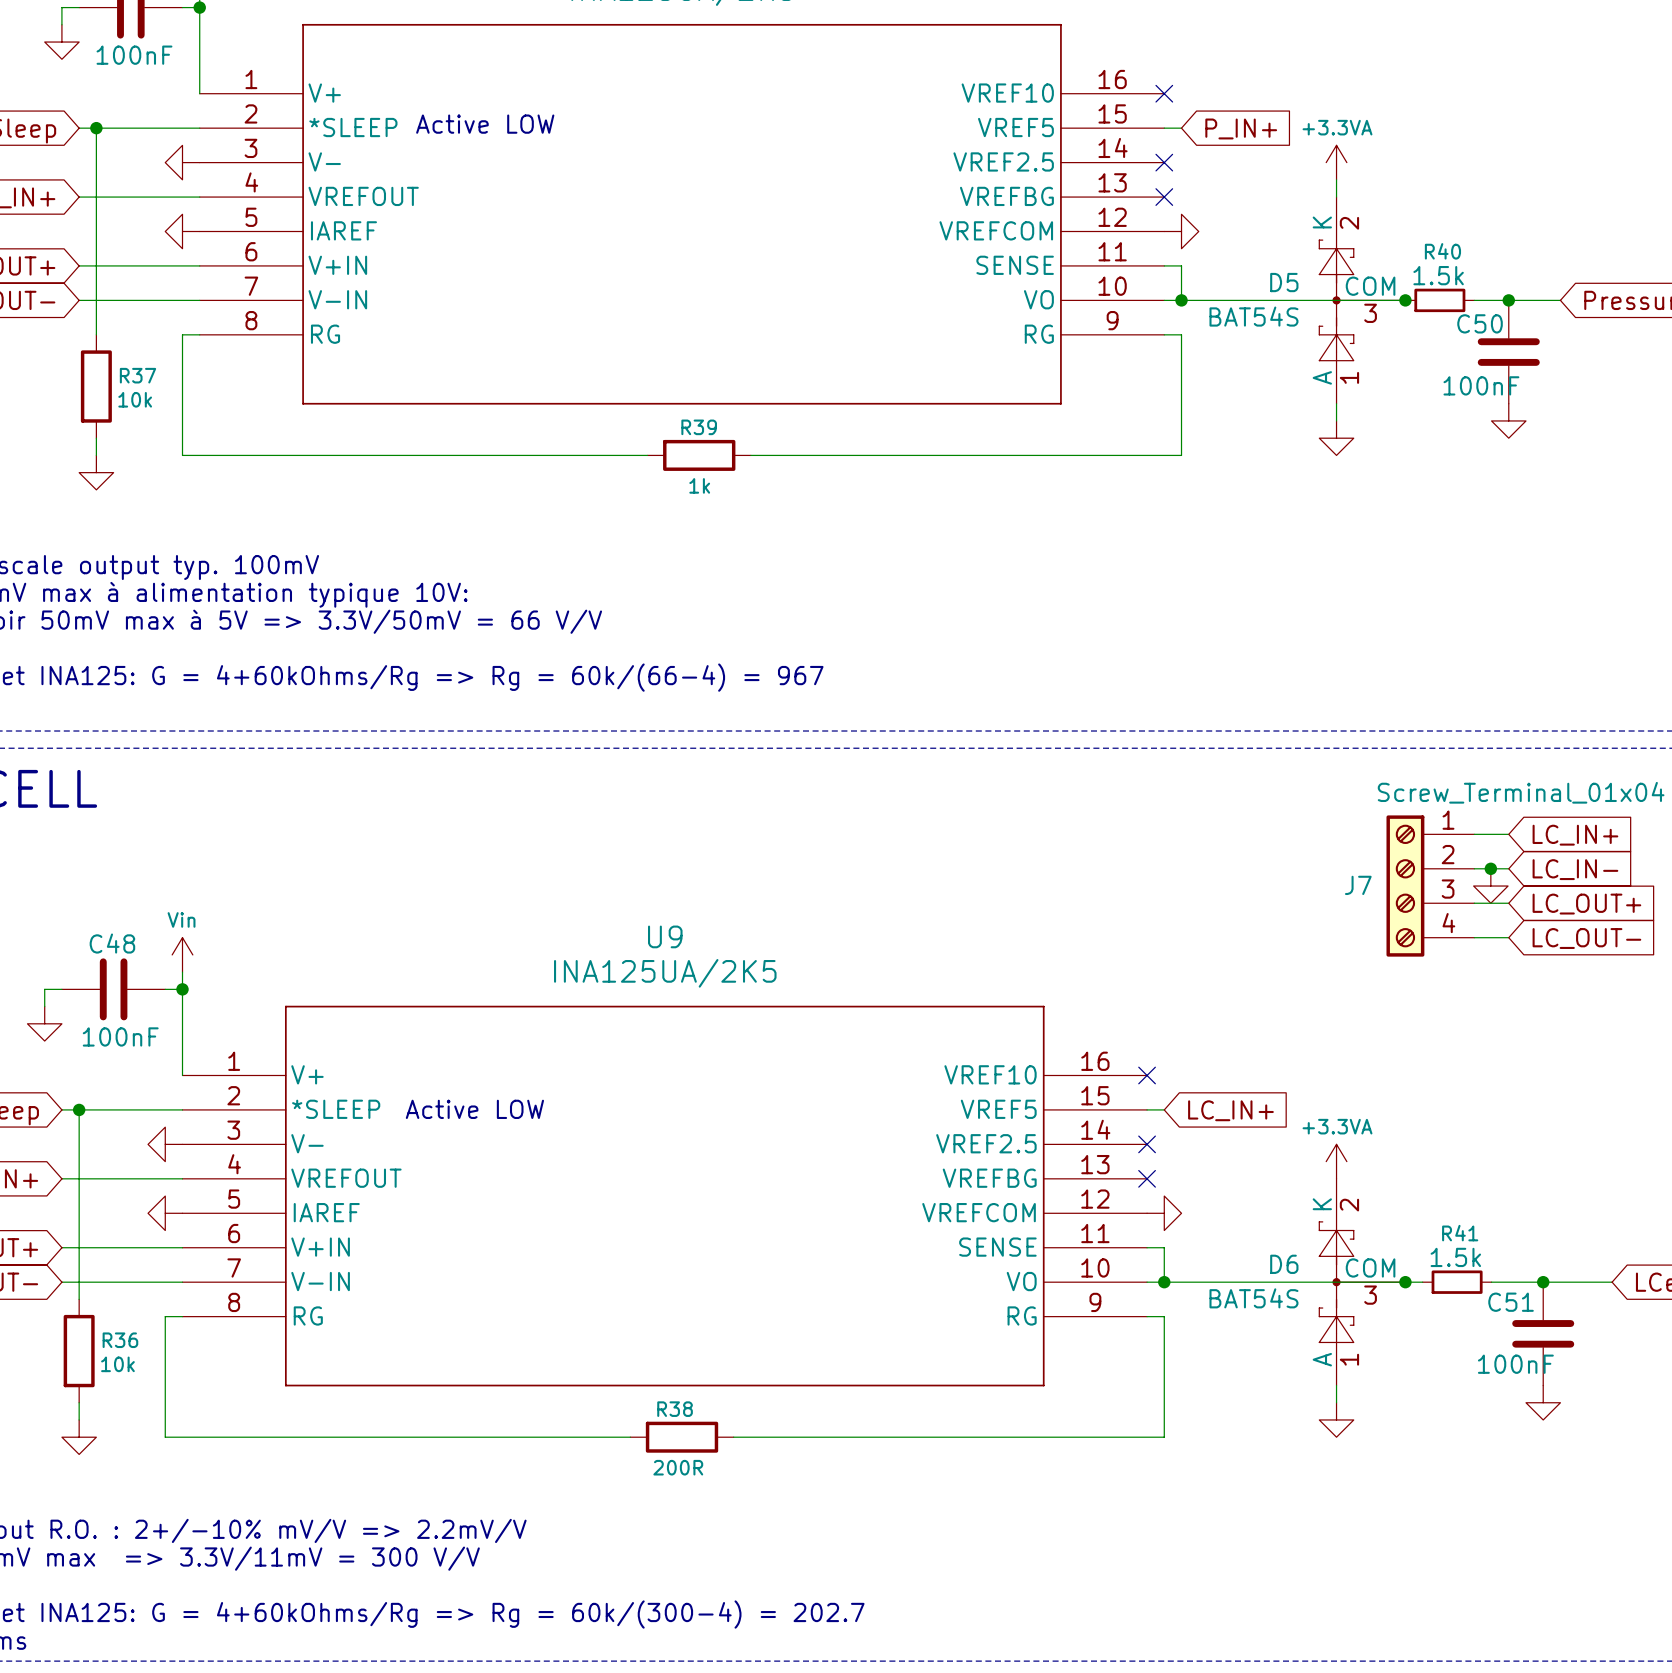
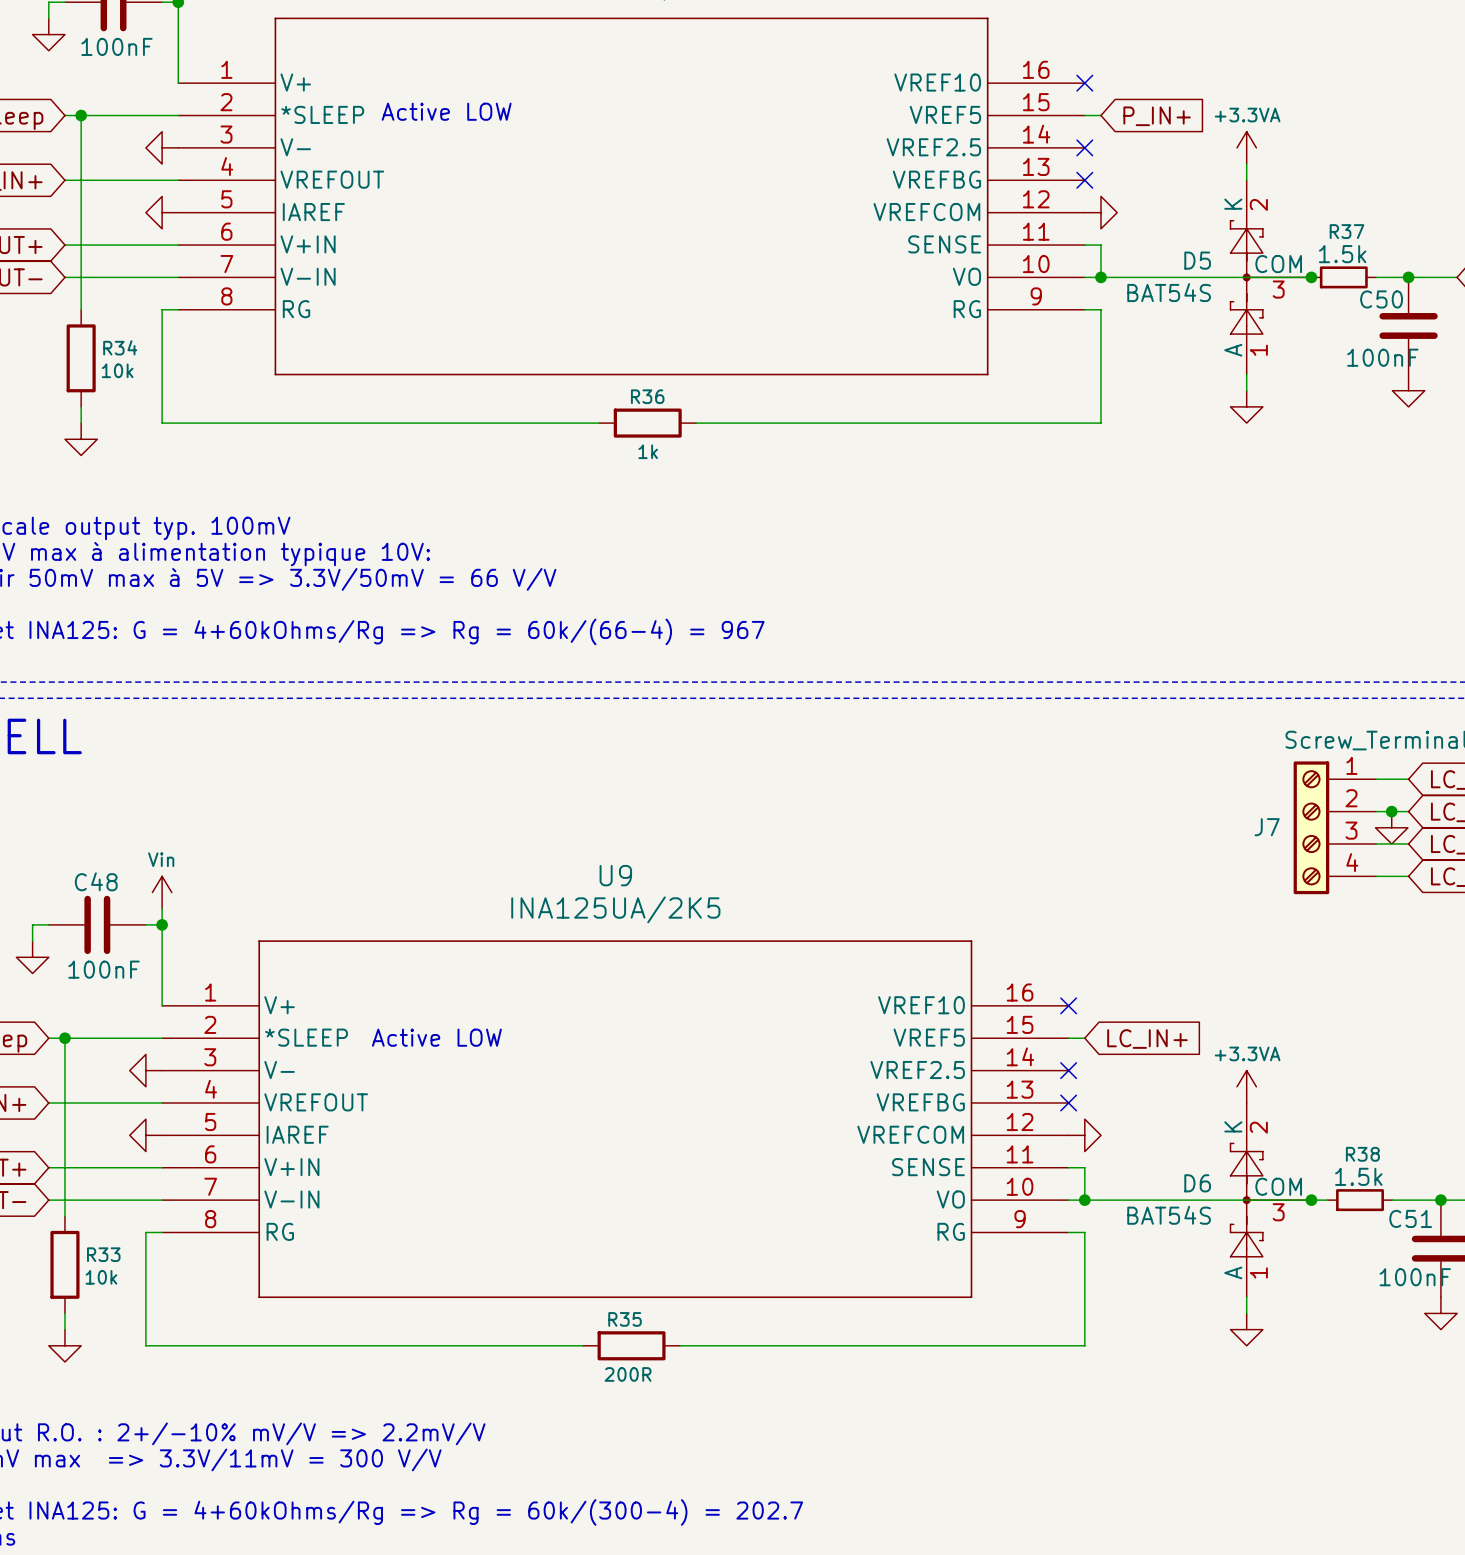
R40 name: R40 (1442, 251) -> R37 (1347, 231)
R37 name: R37 (137, 375) -> R34 (120, 347)
R39 name: R39 (699, 427) -> R36 (647, 396)
R41 name: R41 (1460, 1233) -> R38 (1362, 1154)
R36 name: R36 (120, 1340) -> R33 (103, 1254)
R38 name: R38 (675, 1409) -> R35 (625, 1319)

